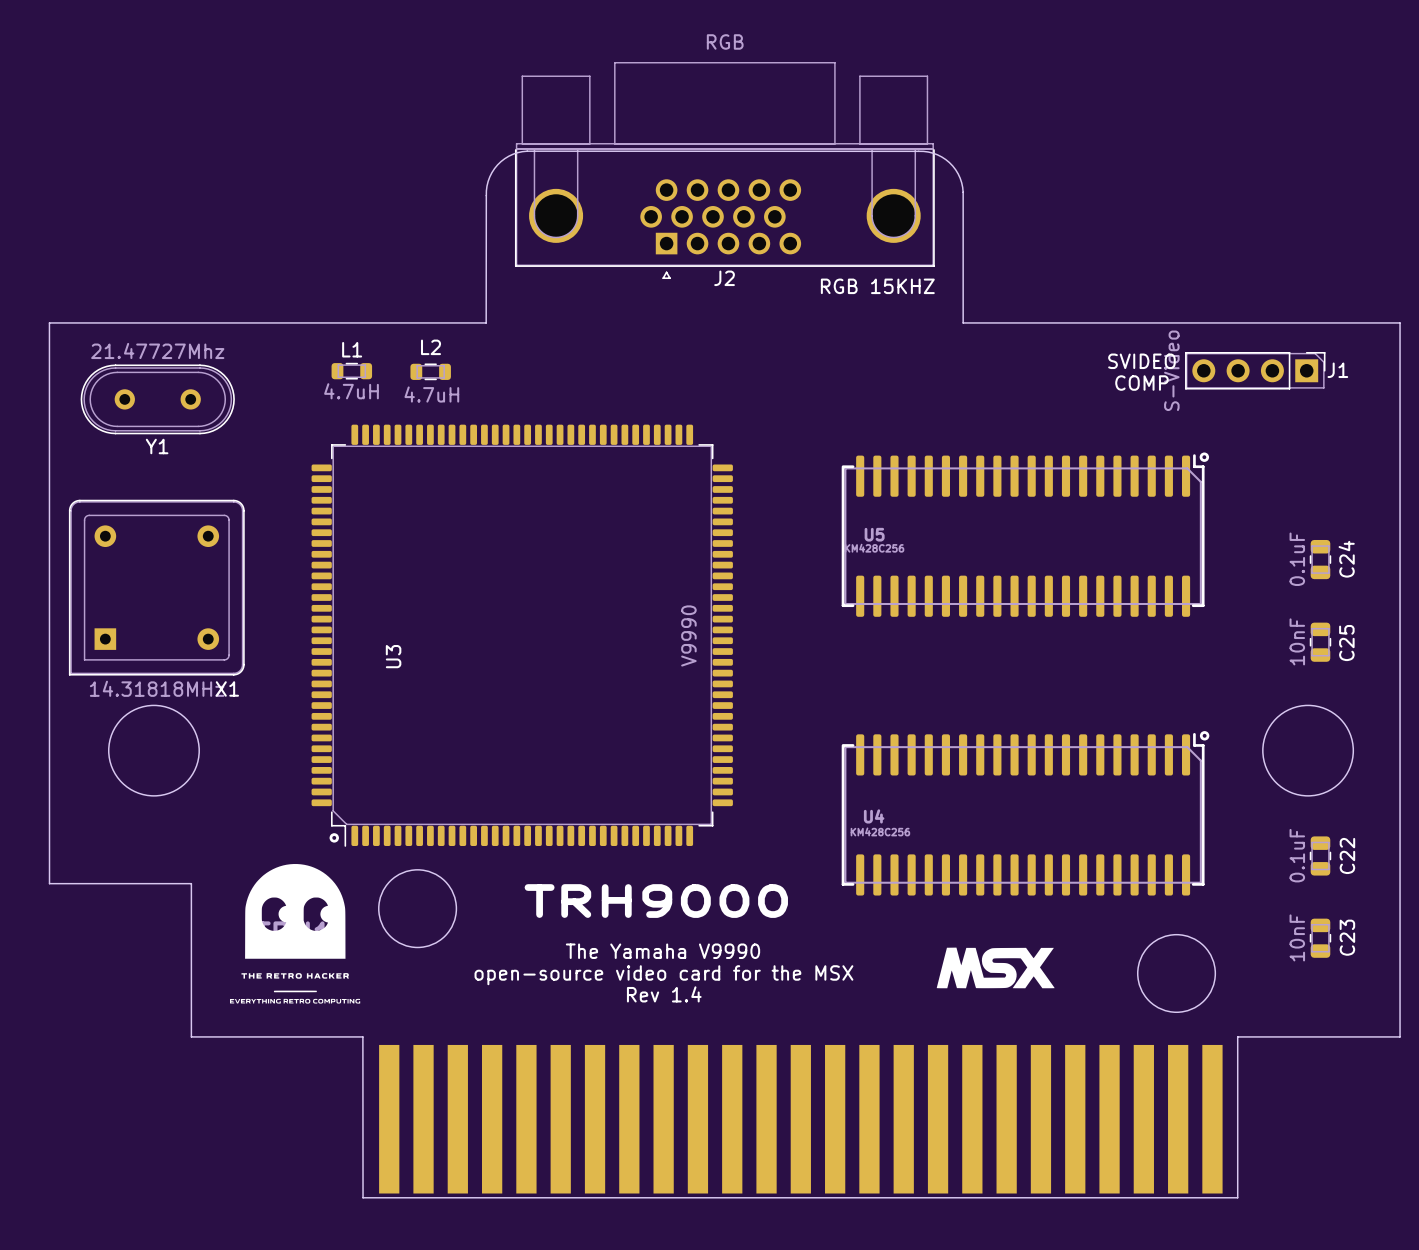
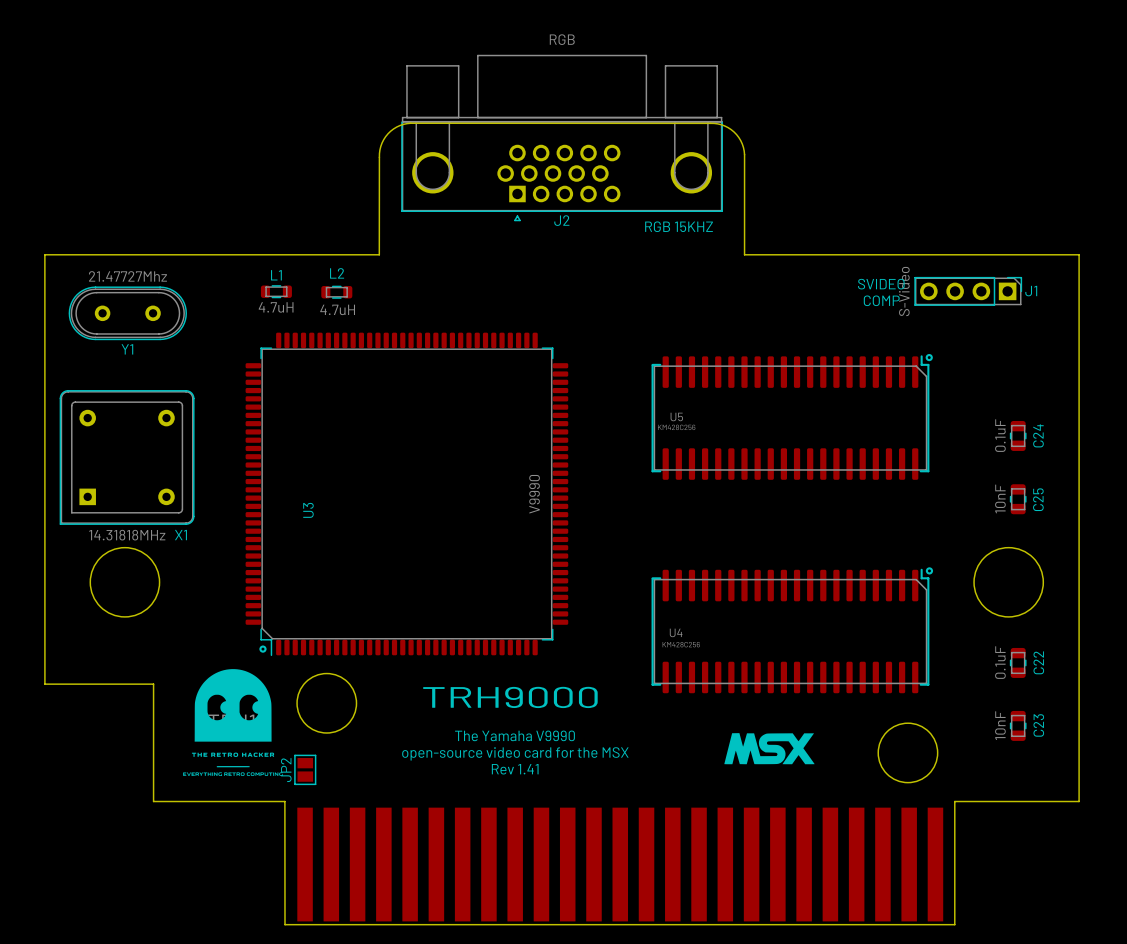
text: Rev 1.4 (664, 994) -> Rev 1.41 (515, 769)
JP2: none -> (305, 769)

